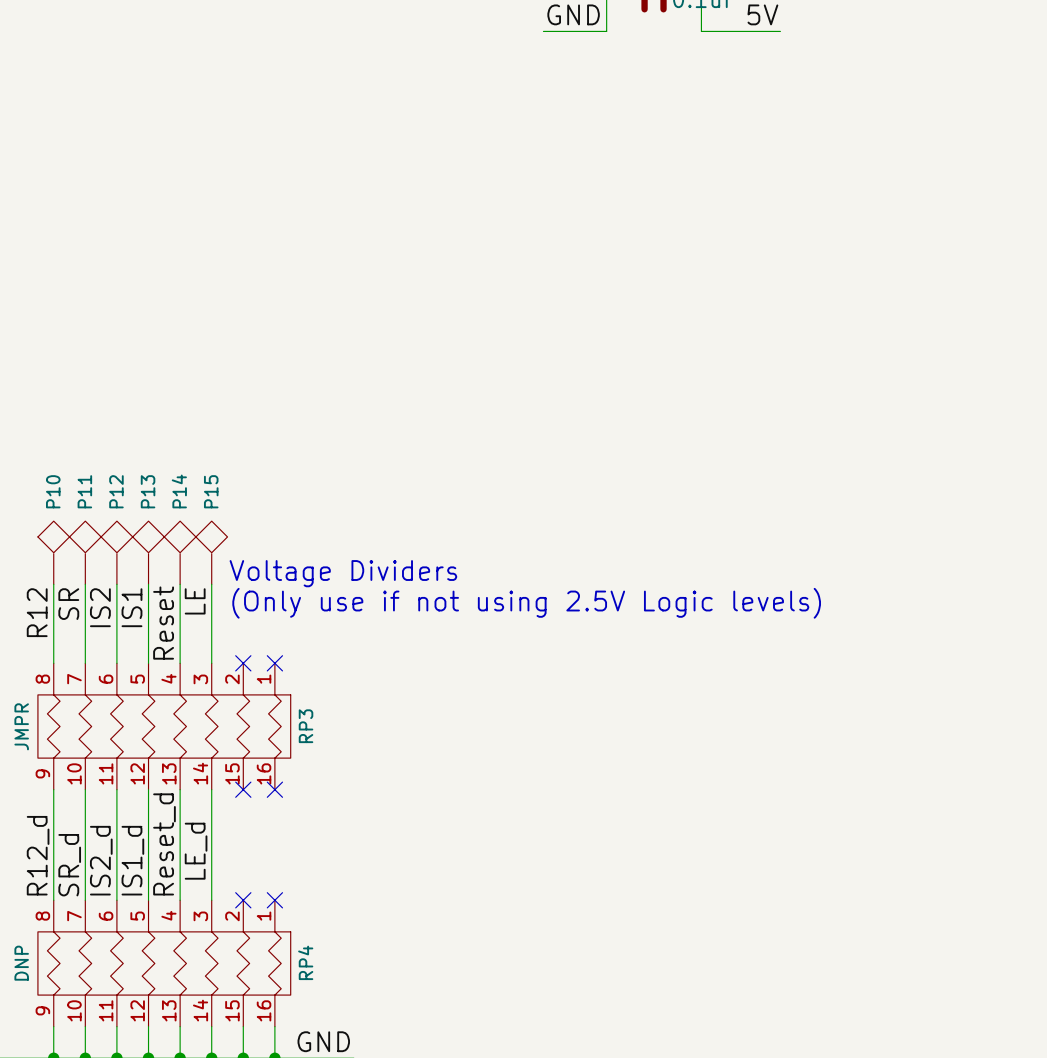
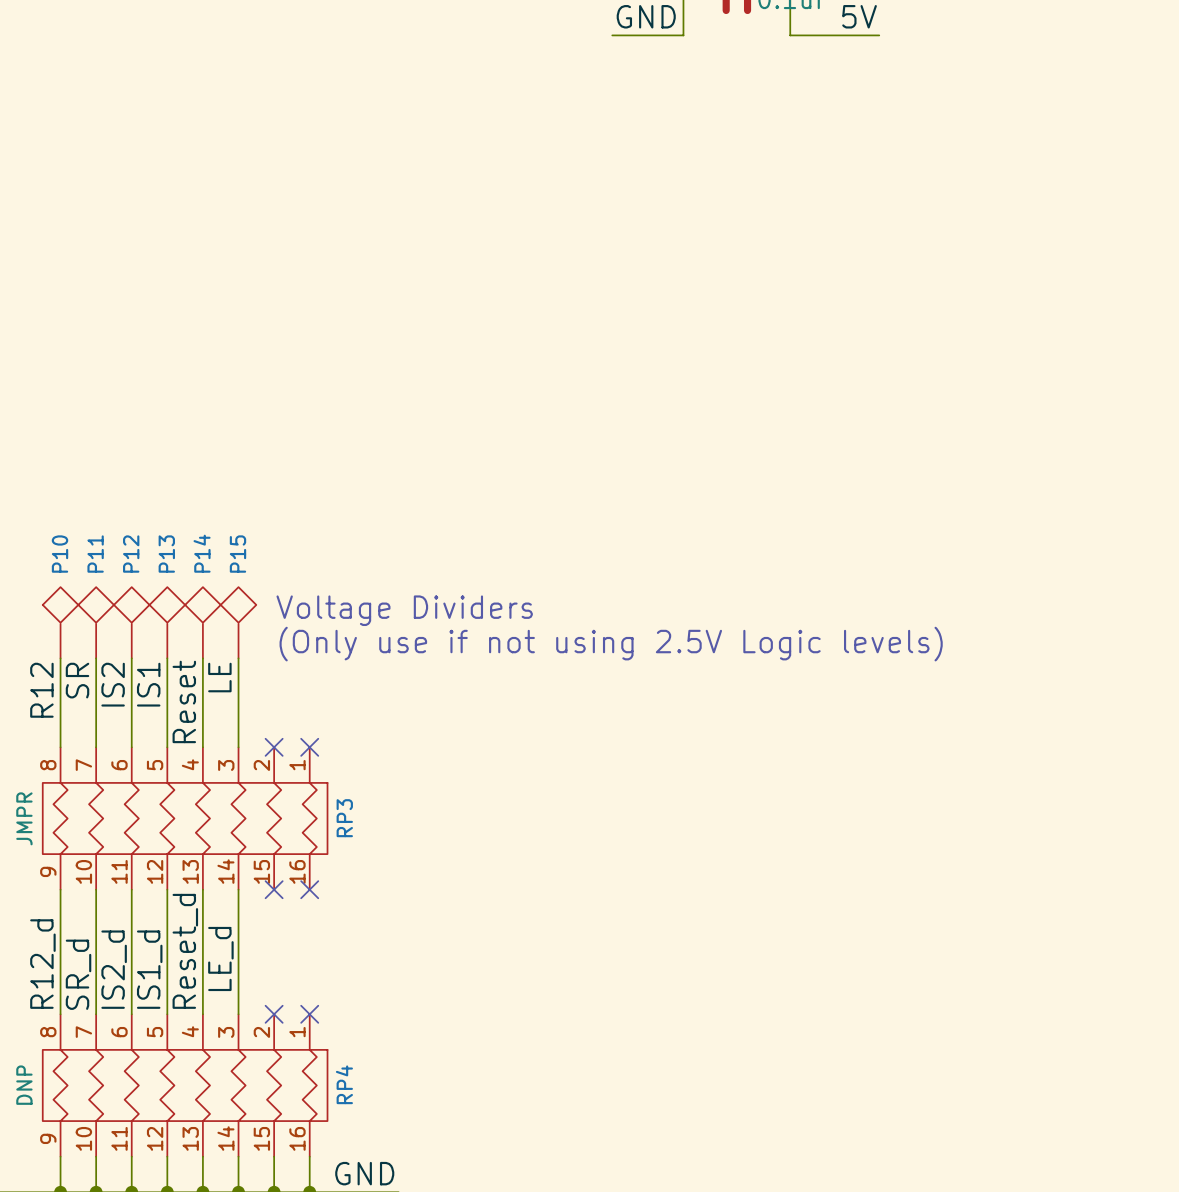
text position: Voltage Dividers (343, 573) -> Voltage Dividers (404, 610)
text position: (Only use if not using 2.5V Logic levels) (526, 603) -> (Only use if not using 2.5V Logic levels) (611, 644)

